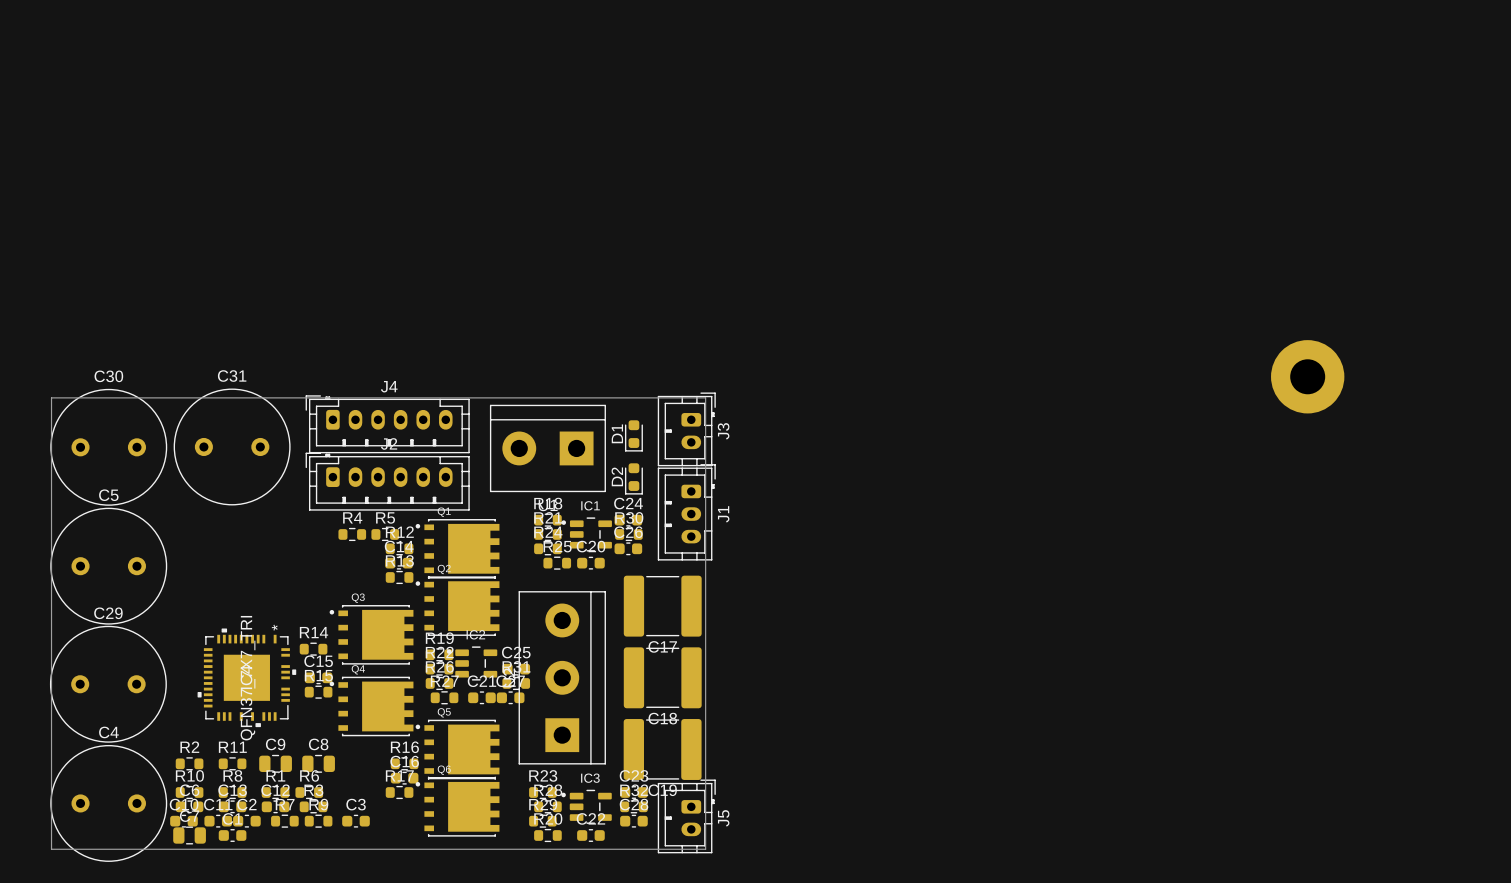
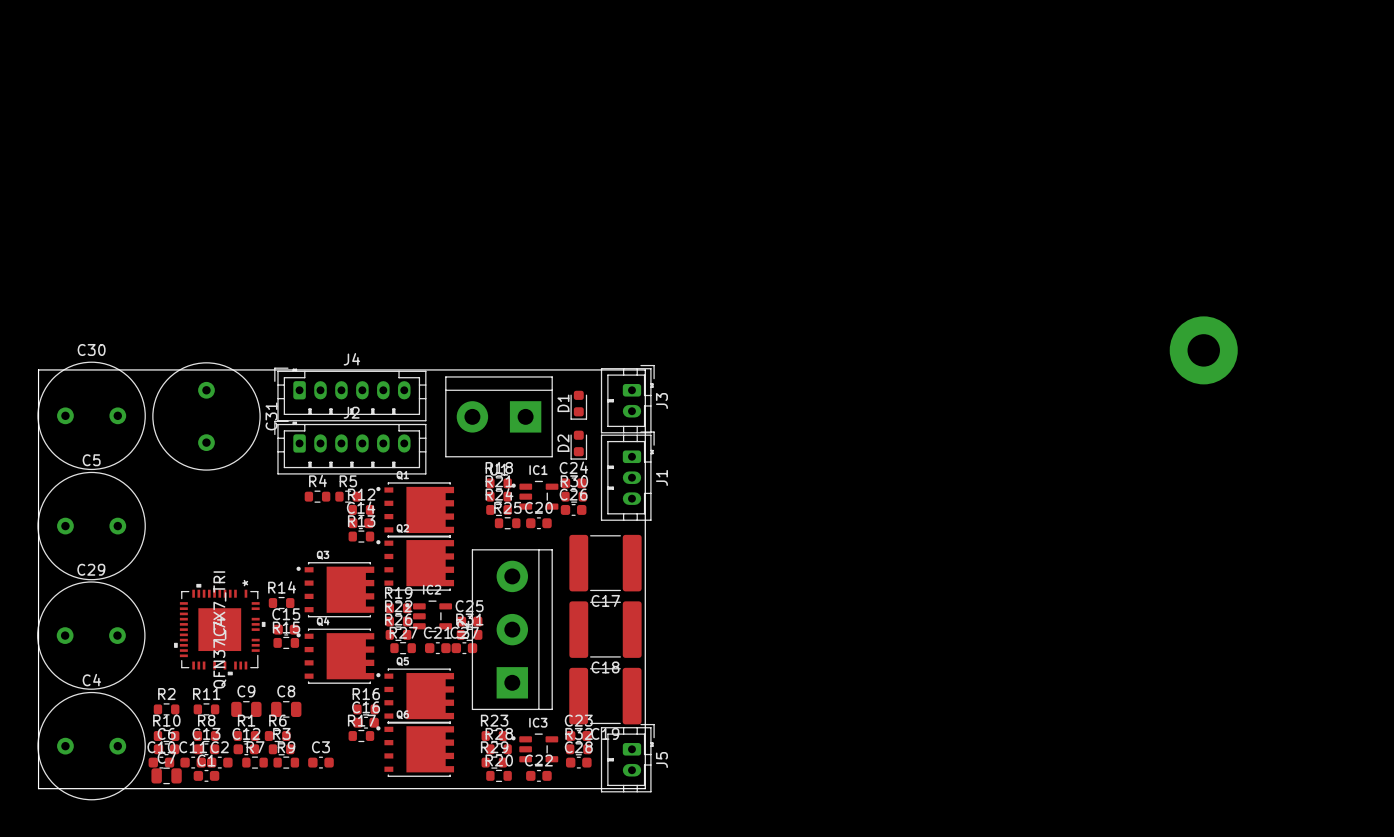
C31 rotation: 0° (232, 446) -> 90° clockwise (206, 416)

